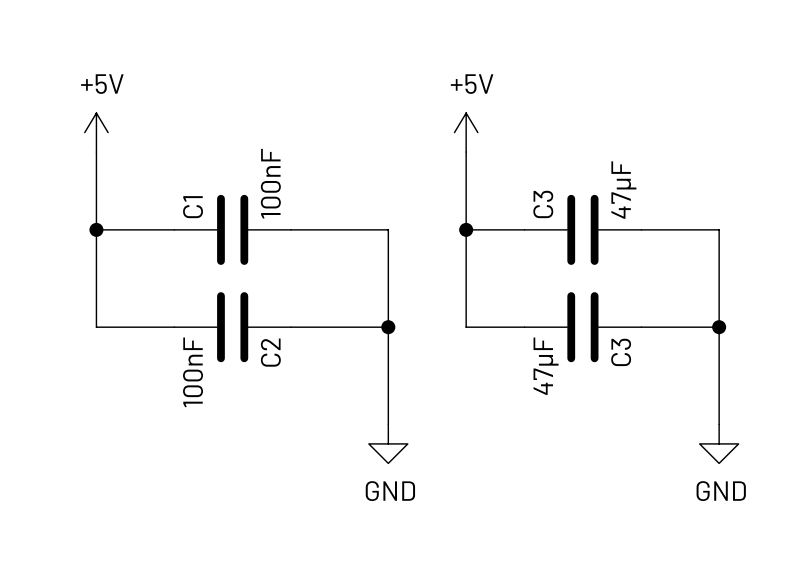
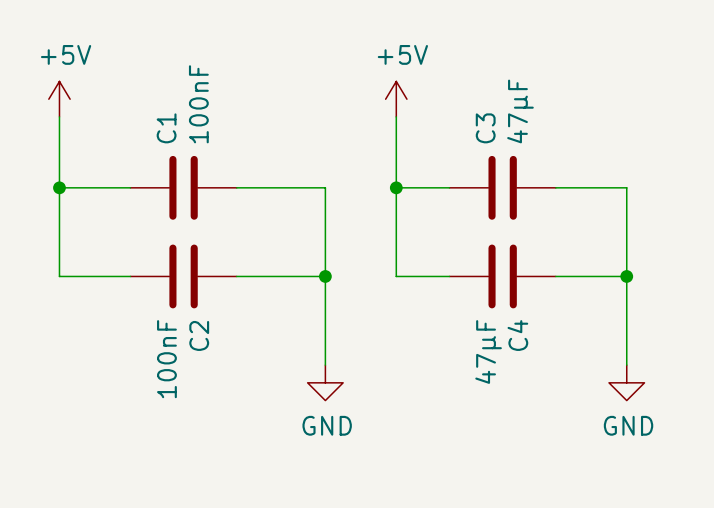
C1 value position: 100nF (270, 183) -> 100nF (198, 104)
C3 value position: 47µF (623, 190) -> 47µF (520, 111)
C3 name position: C3 (543, 204) -> C3 (485, 128)
C1 name position: C1 (193, 207) -> C1 (166, 128)
C2 name position: C2 (270, 352) -> C2 (199, 335)
C3 name: C3 (621, 352) -> C4 (517, 335)
C3 value position: 47µF (546, 366) -> 47µF (488, 351)
C2 value position: 100nF (193, 372) -> 100nF (166, 359)

